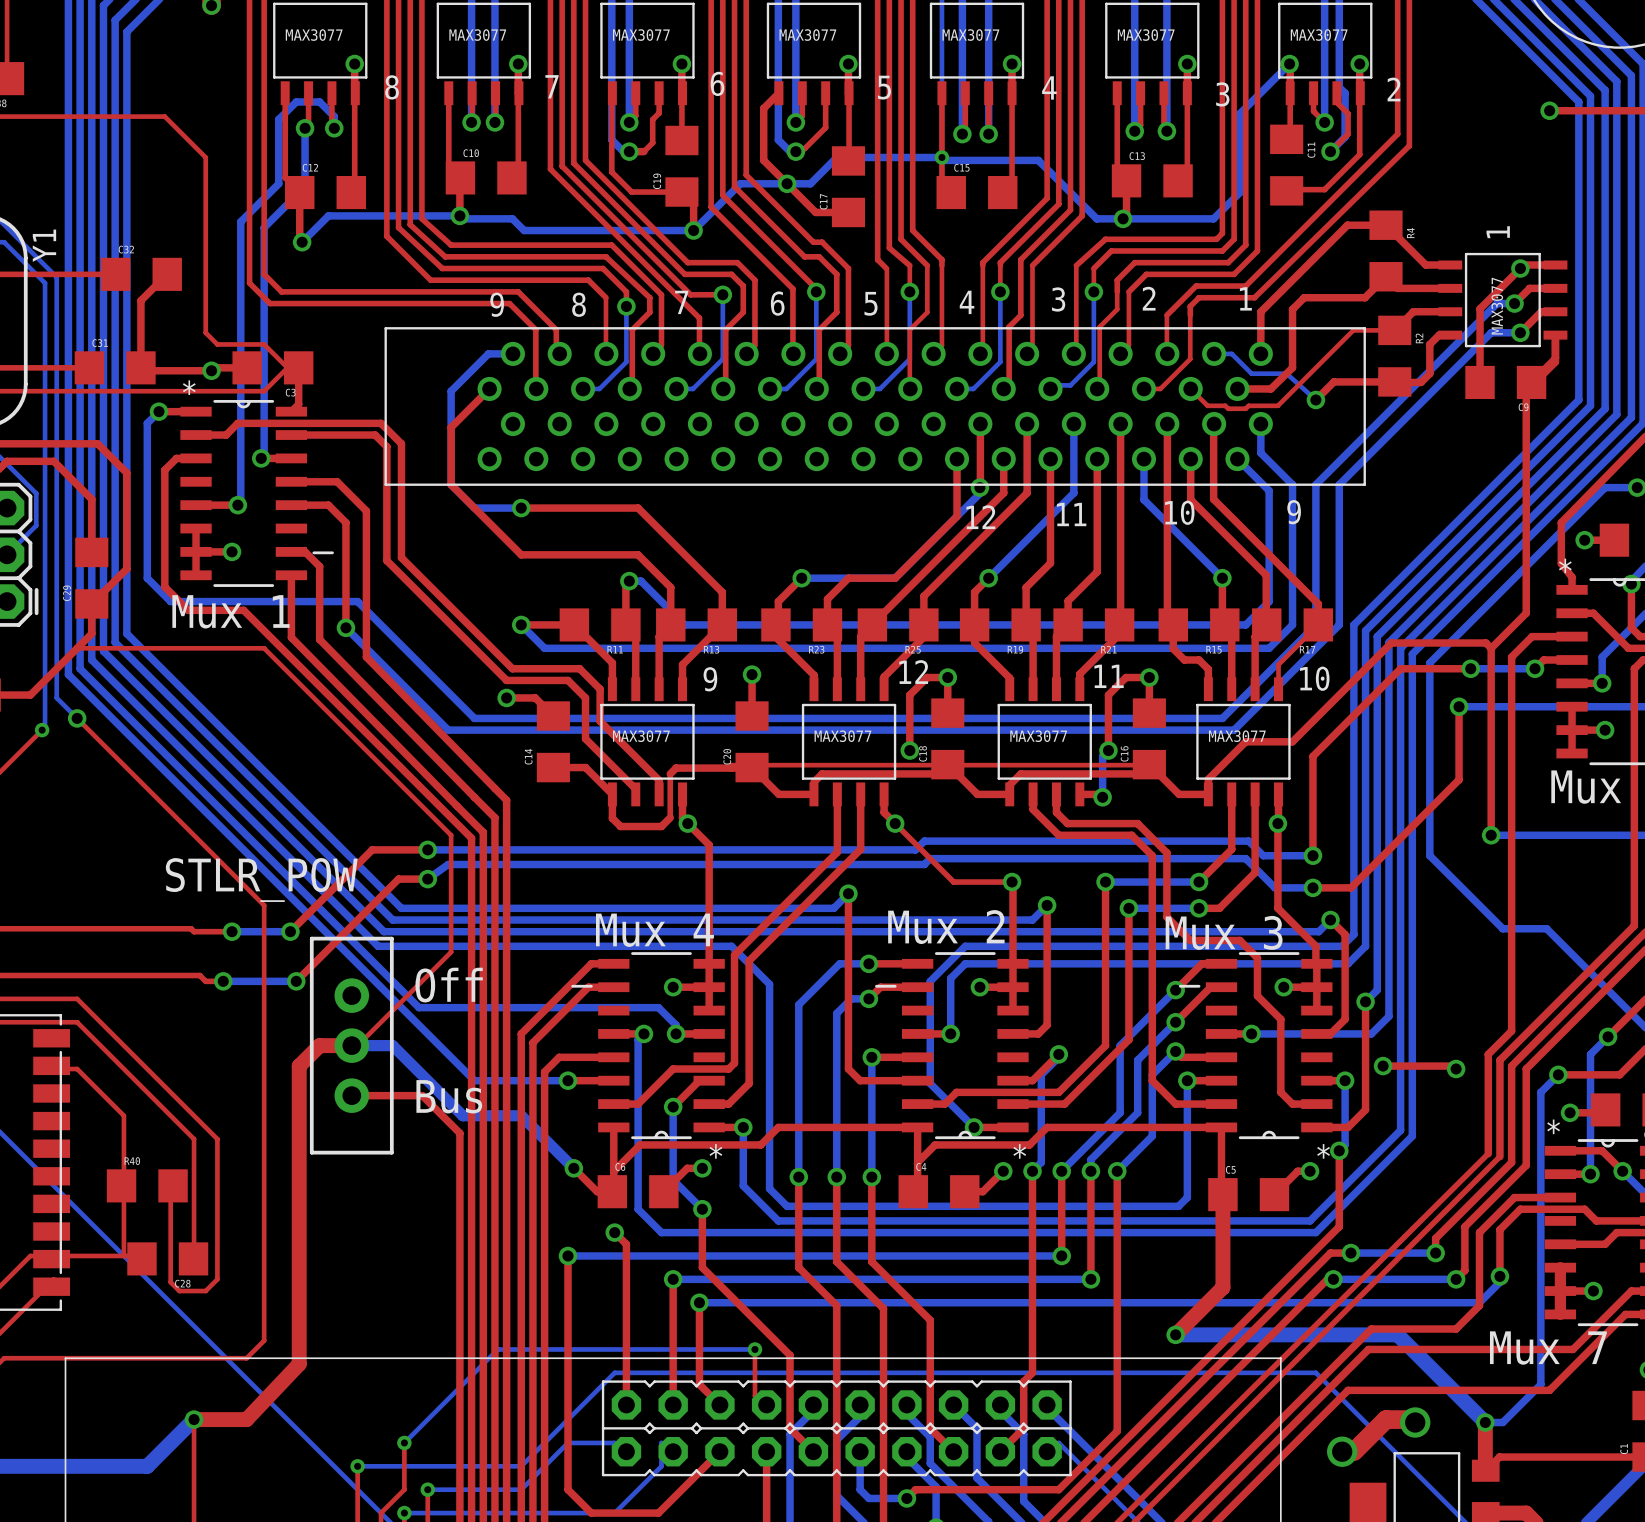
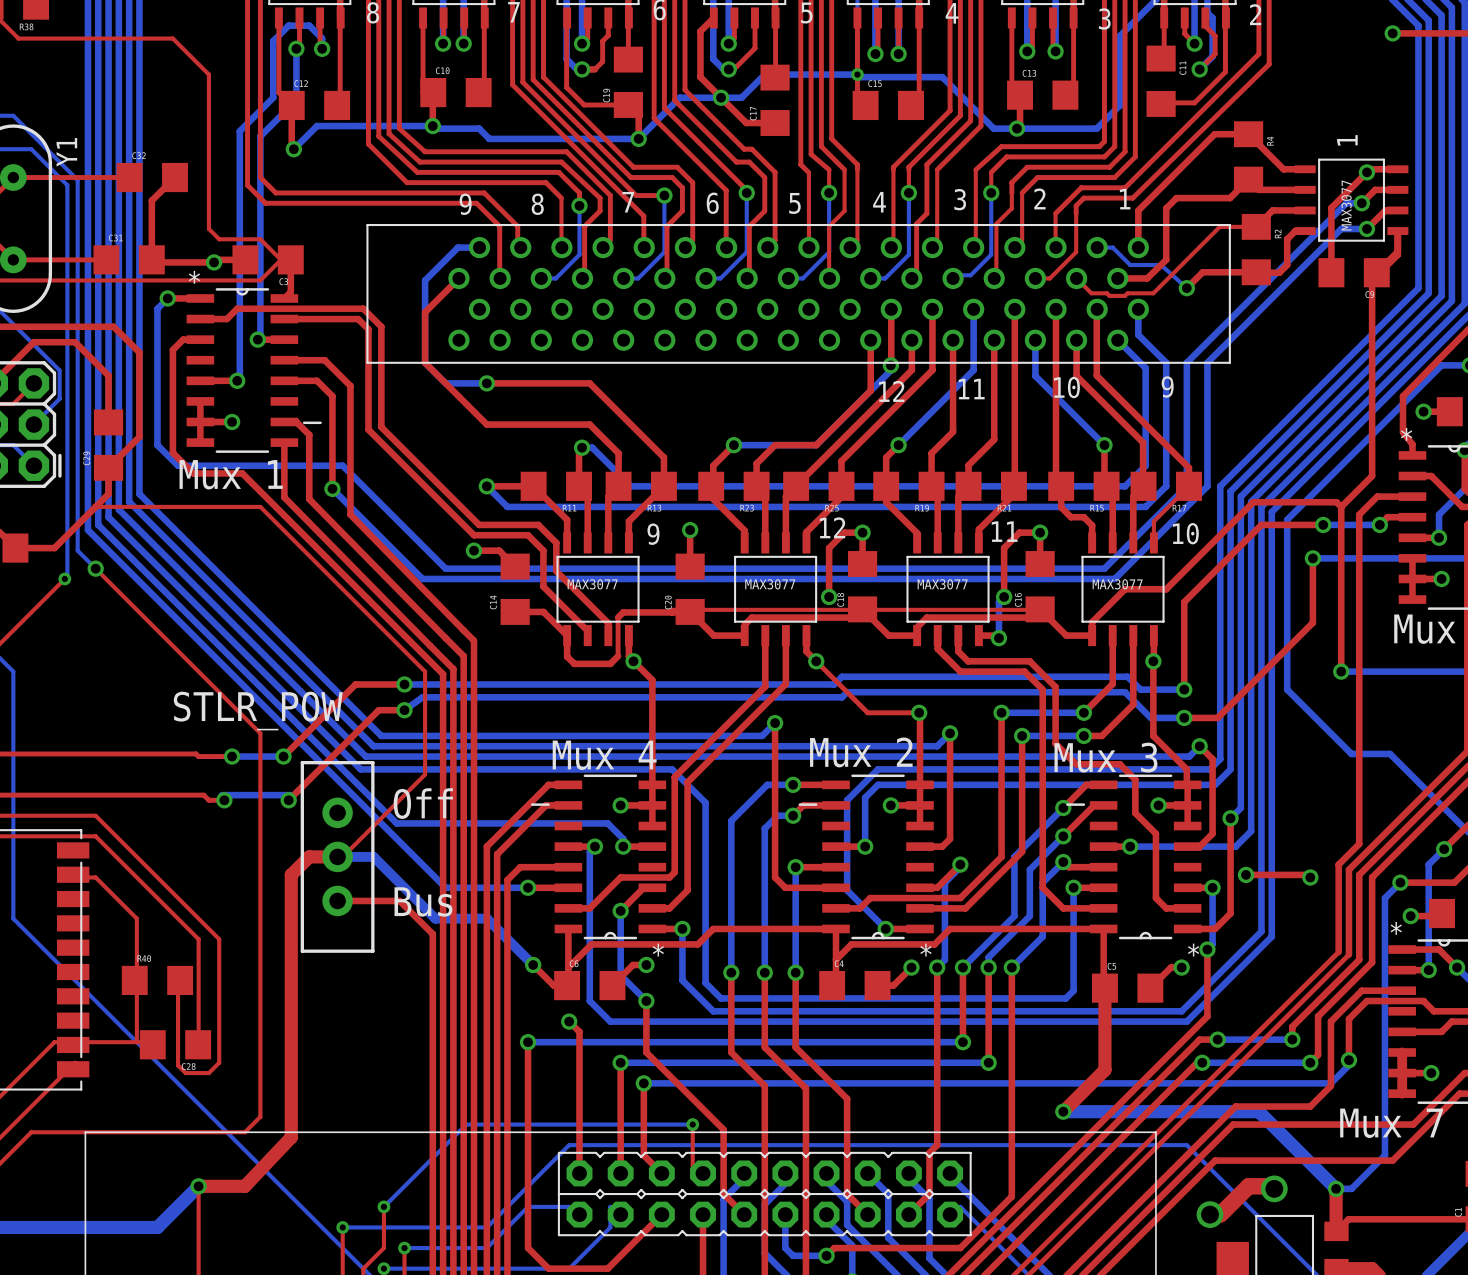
bottom track: none -> (221, 795) (291, 795)
bottom track: (223, 981) (296, 981) -> none

